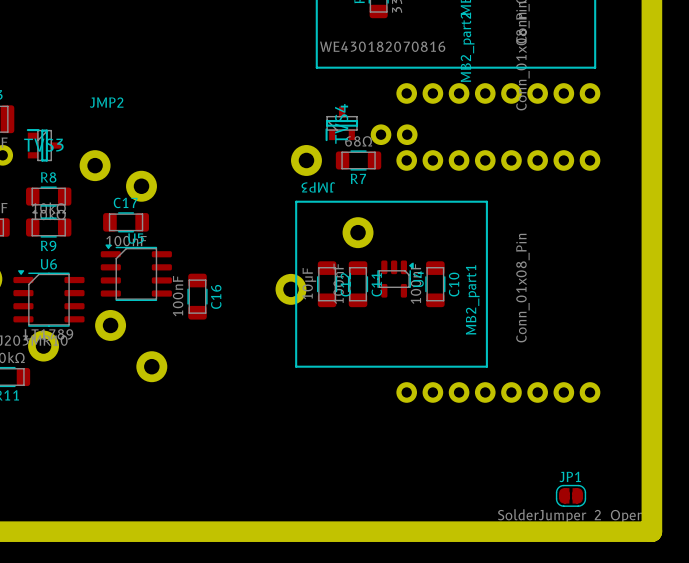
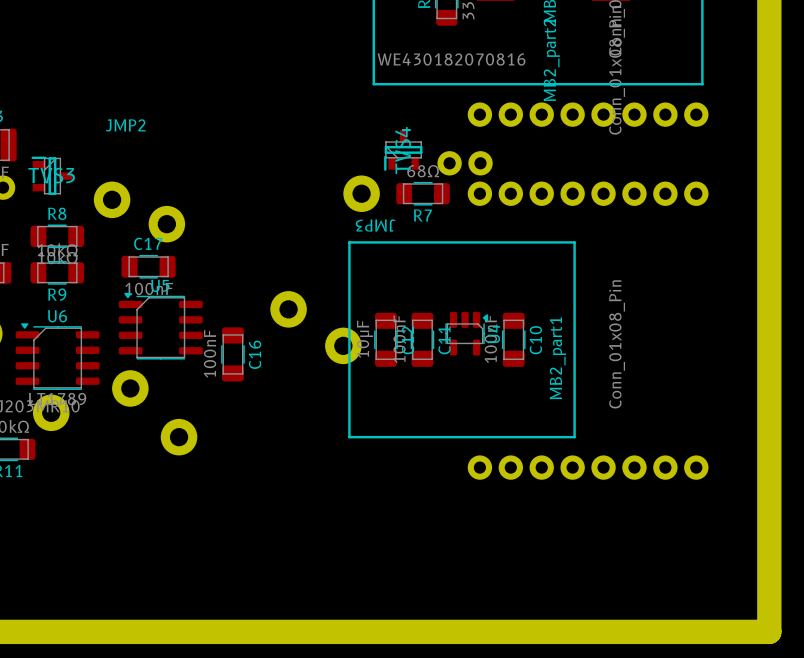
part position: (358, 232) -> (288, 309)
JP1: SolderJumper_2_Open (571, 495) -> none

